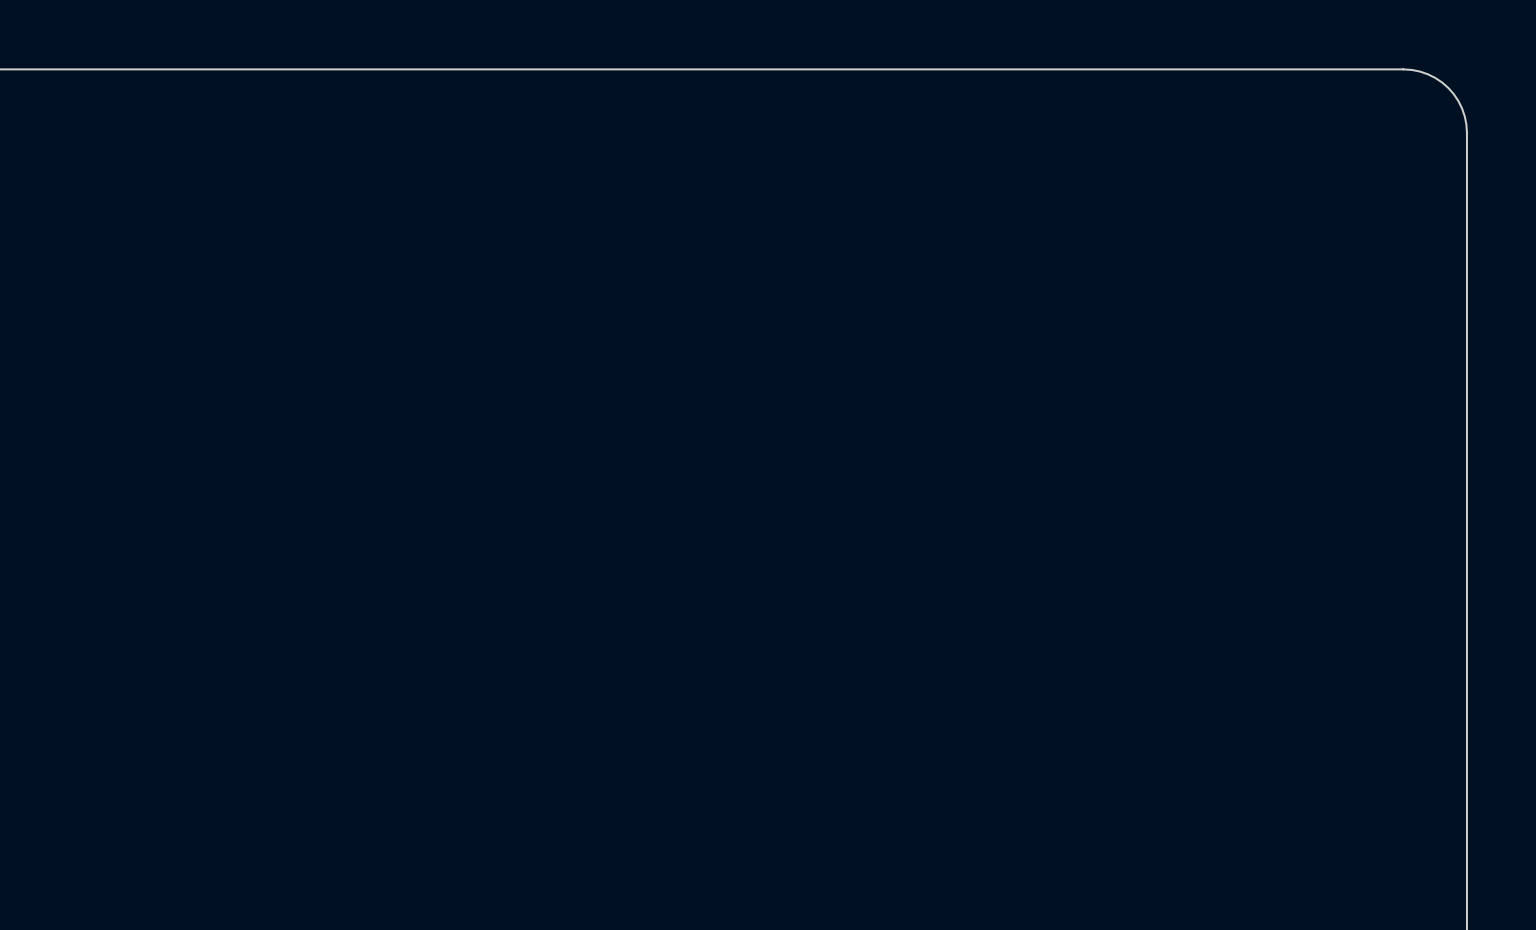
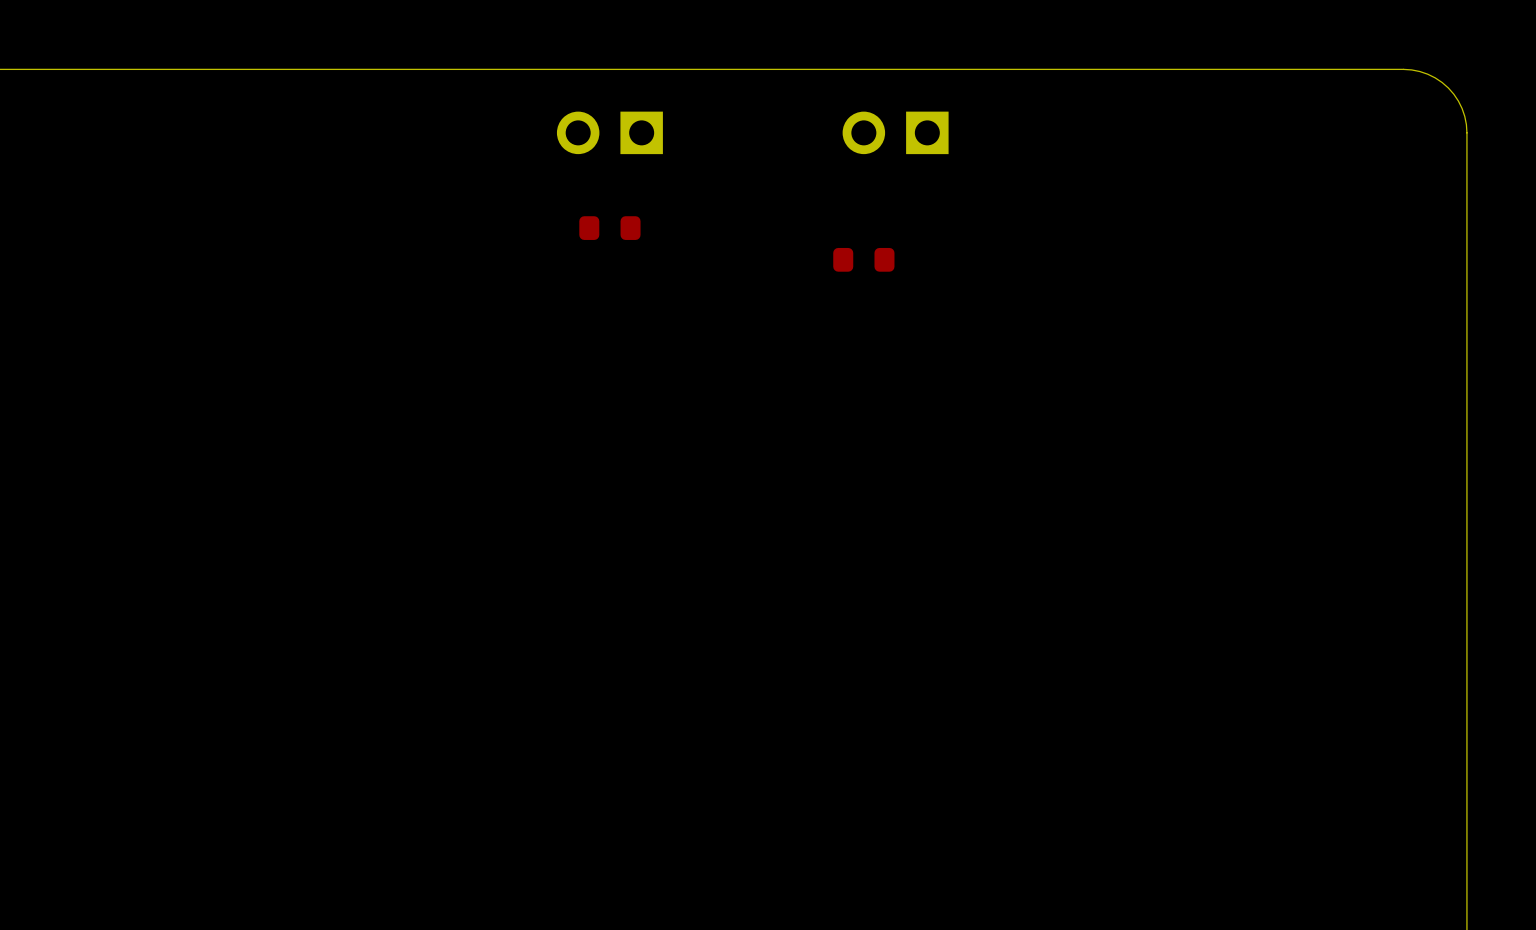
part: none -> (609, 132)
part: none -> (895, 132)
part: none -> (609, 228)
part: none -> (863, 259)

